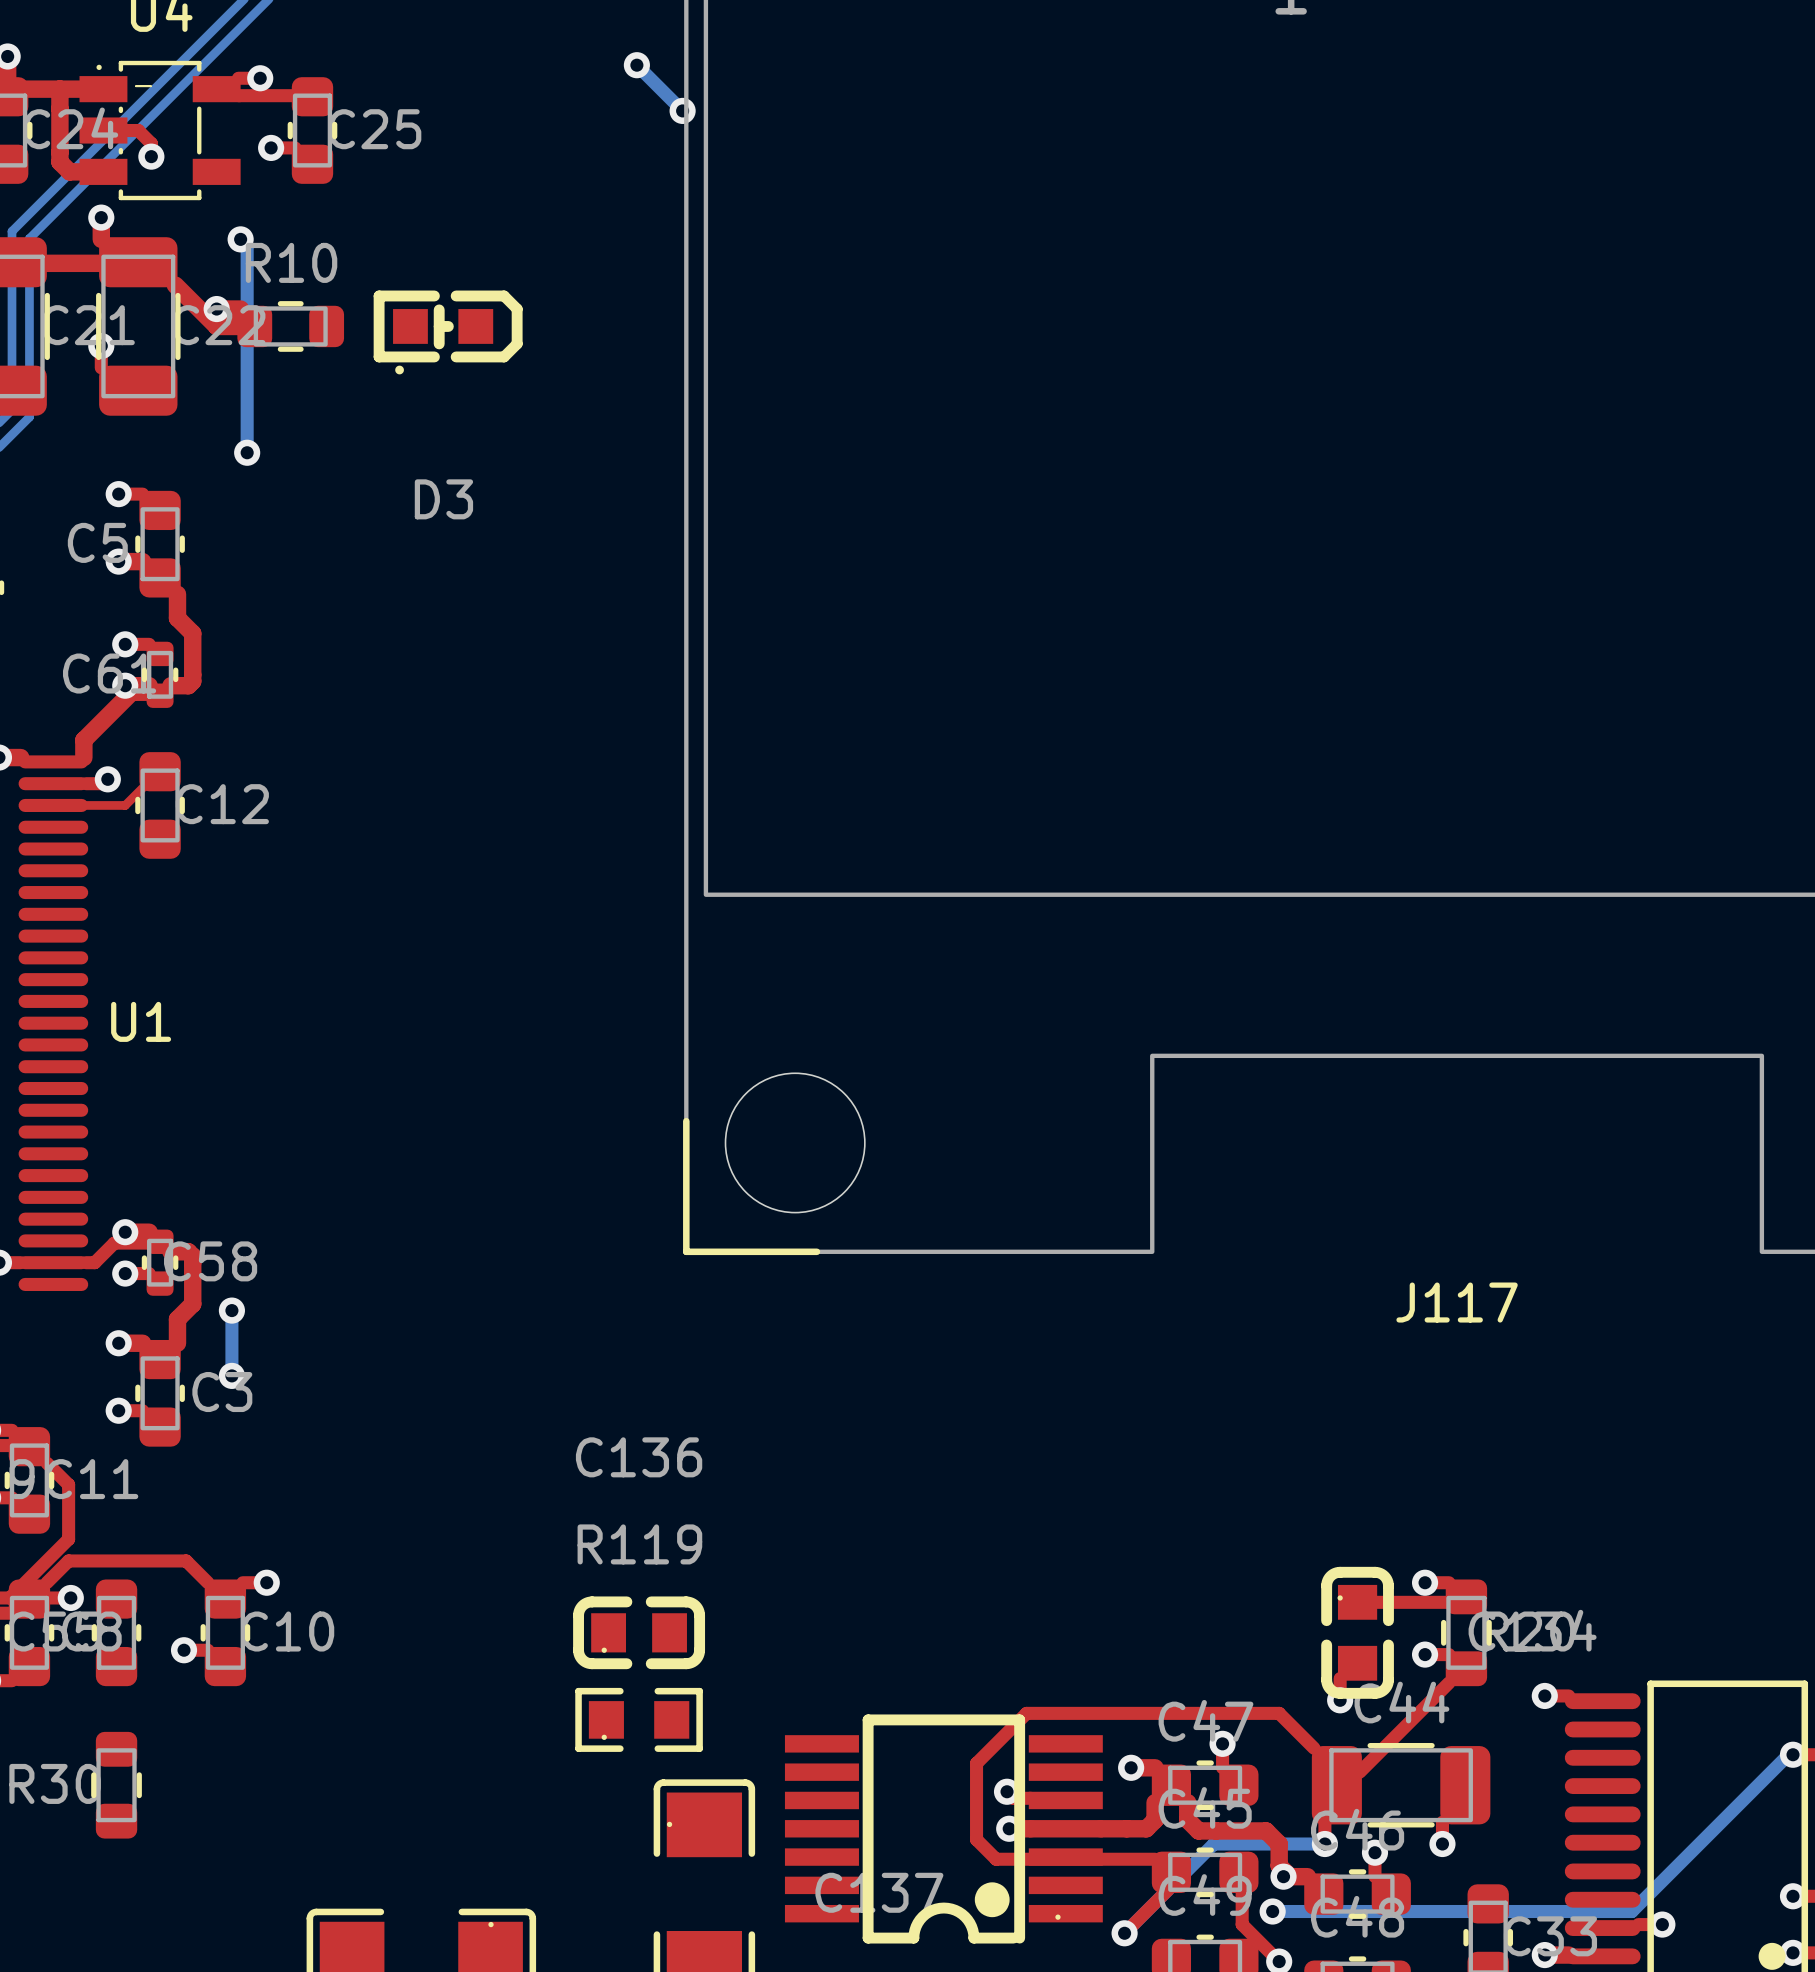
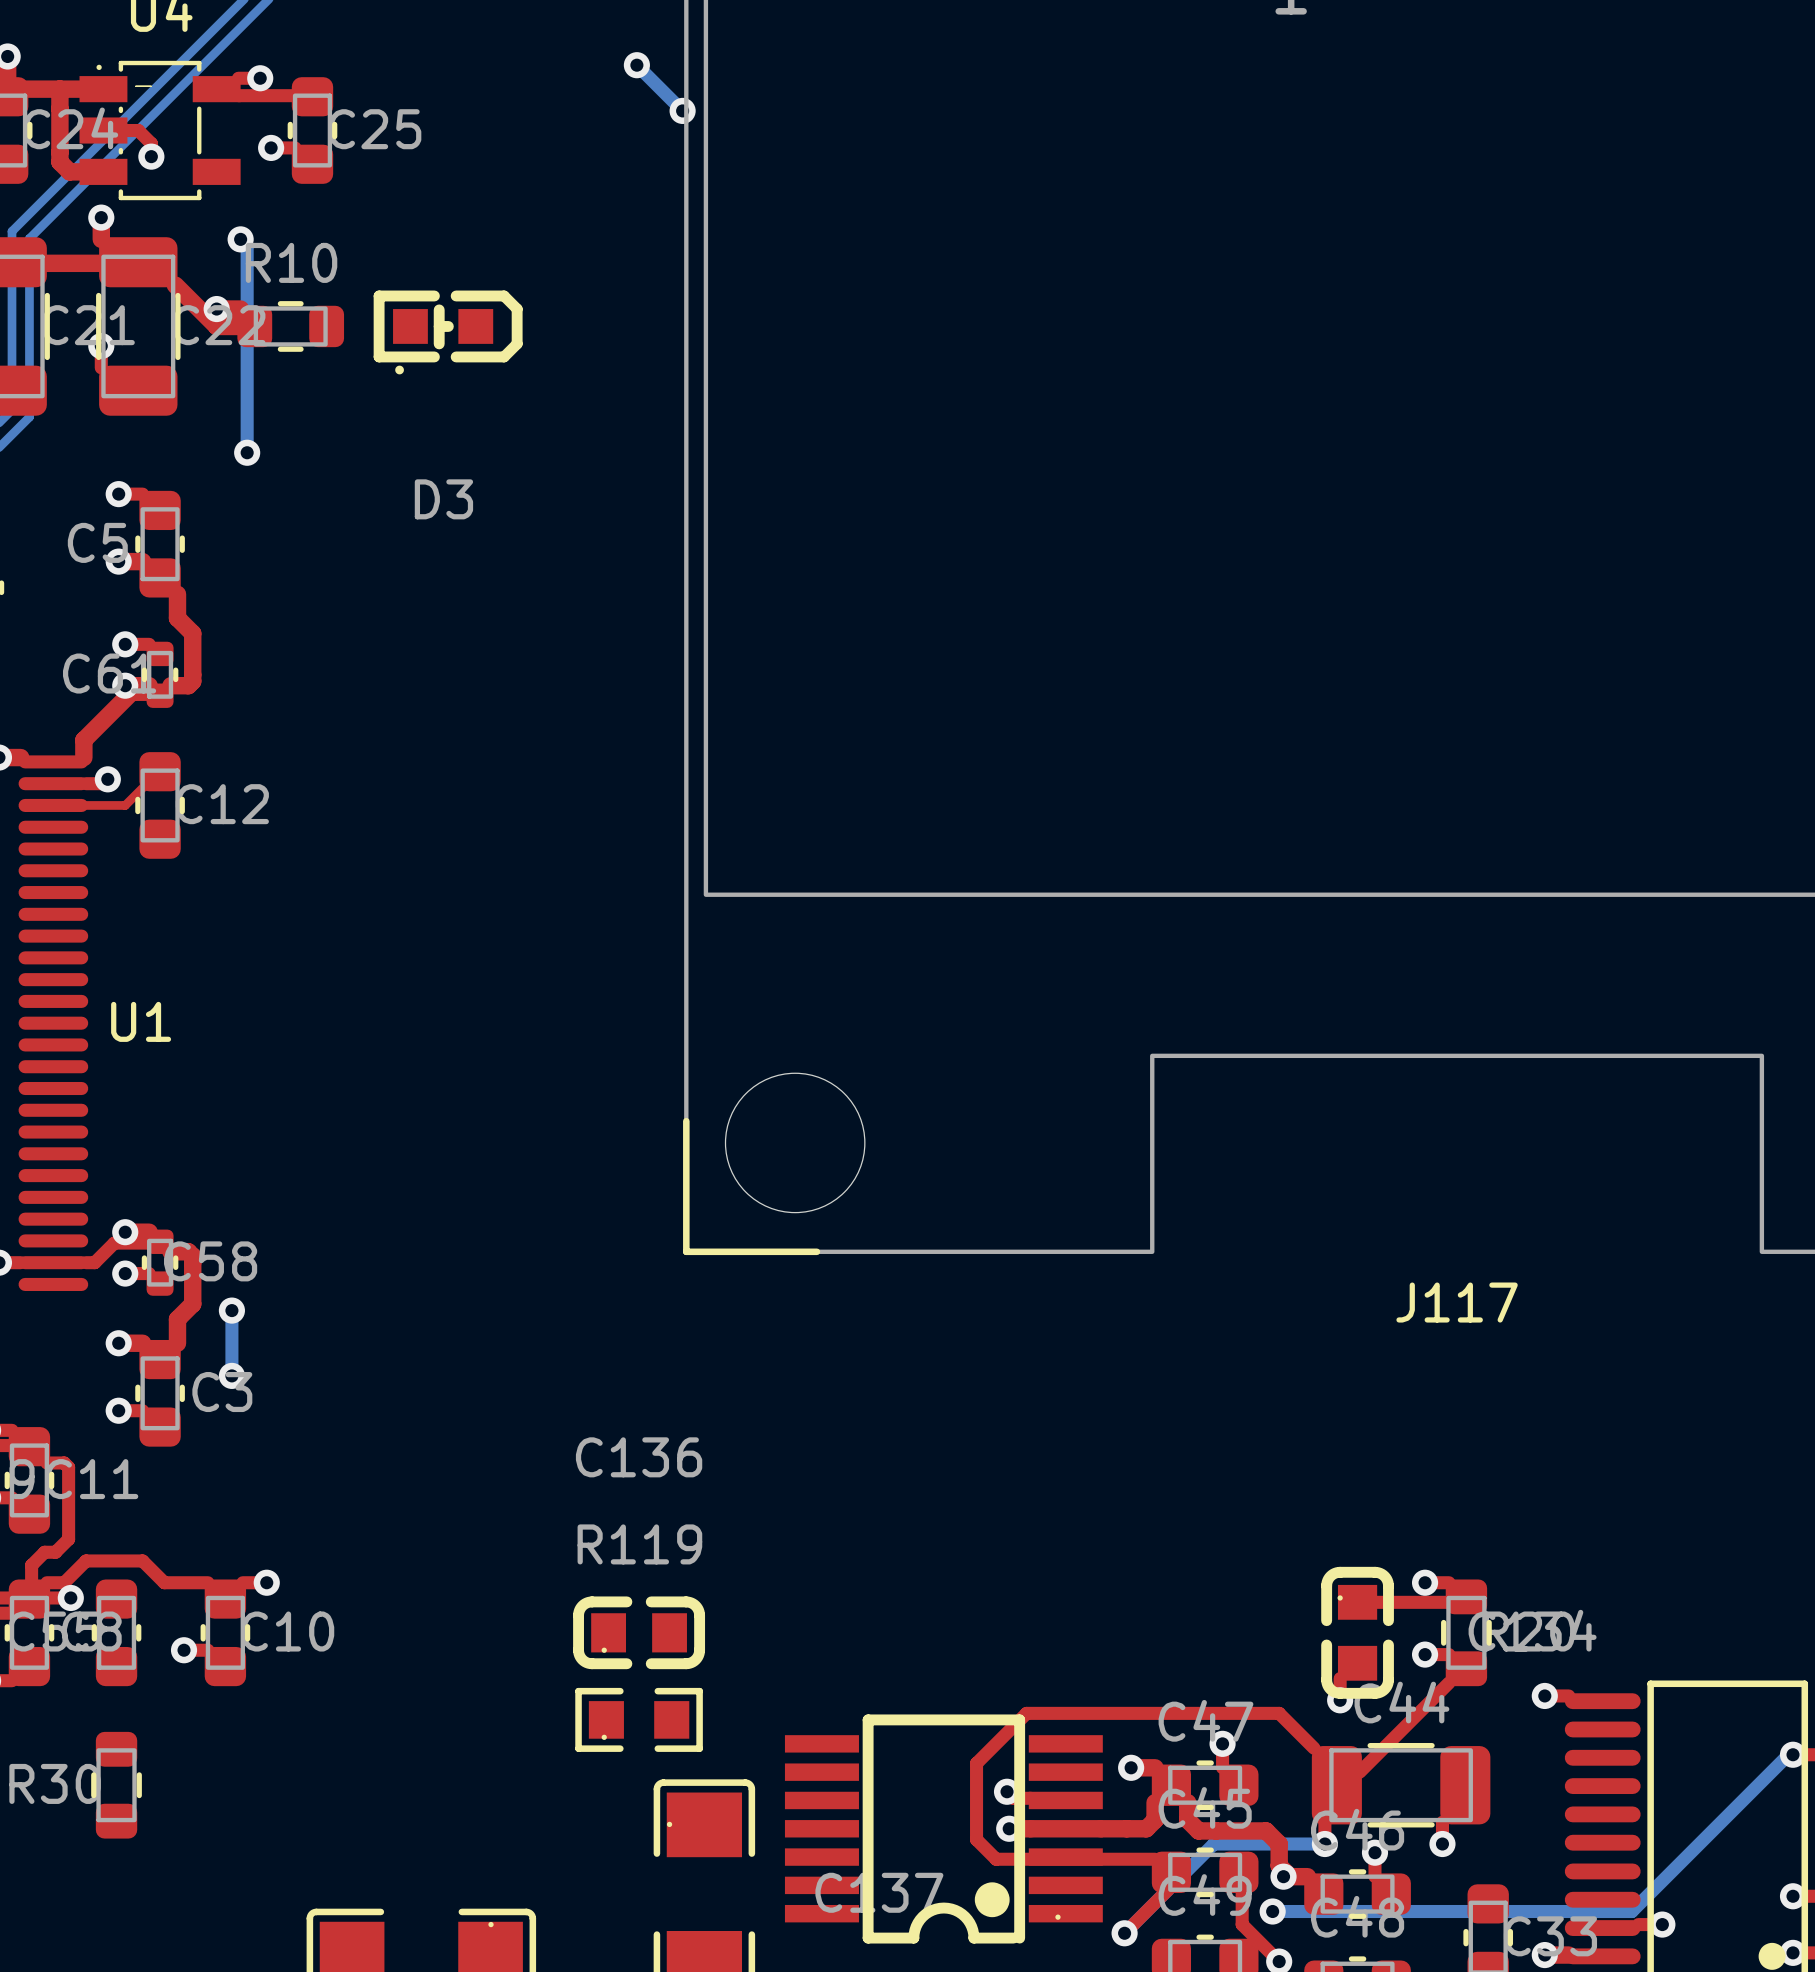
top track: (46, 1462) (68, 1484) -> (46, 1462) (64, 1462) (68, 1467) (68, 1484)
top track: (55, 1552) (9, 1597) -> (55, 1552) (44, 1552) (31, 1565) (31, 1582)
top track: (86, 1560) (68, 1560) (46, 1582) -> (86, 1560) (64, 1582) (46, 1582)
top track: (142, 1560) (186, 1560) (207, 1582) -> (142, 1560) (164, 1582) (207, 1582)

